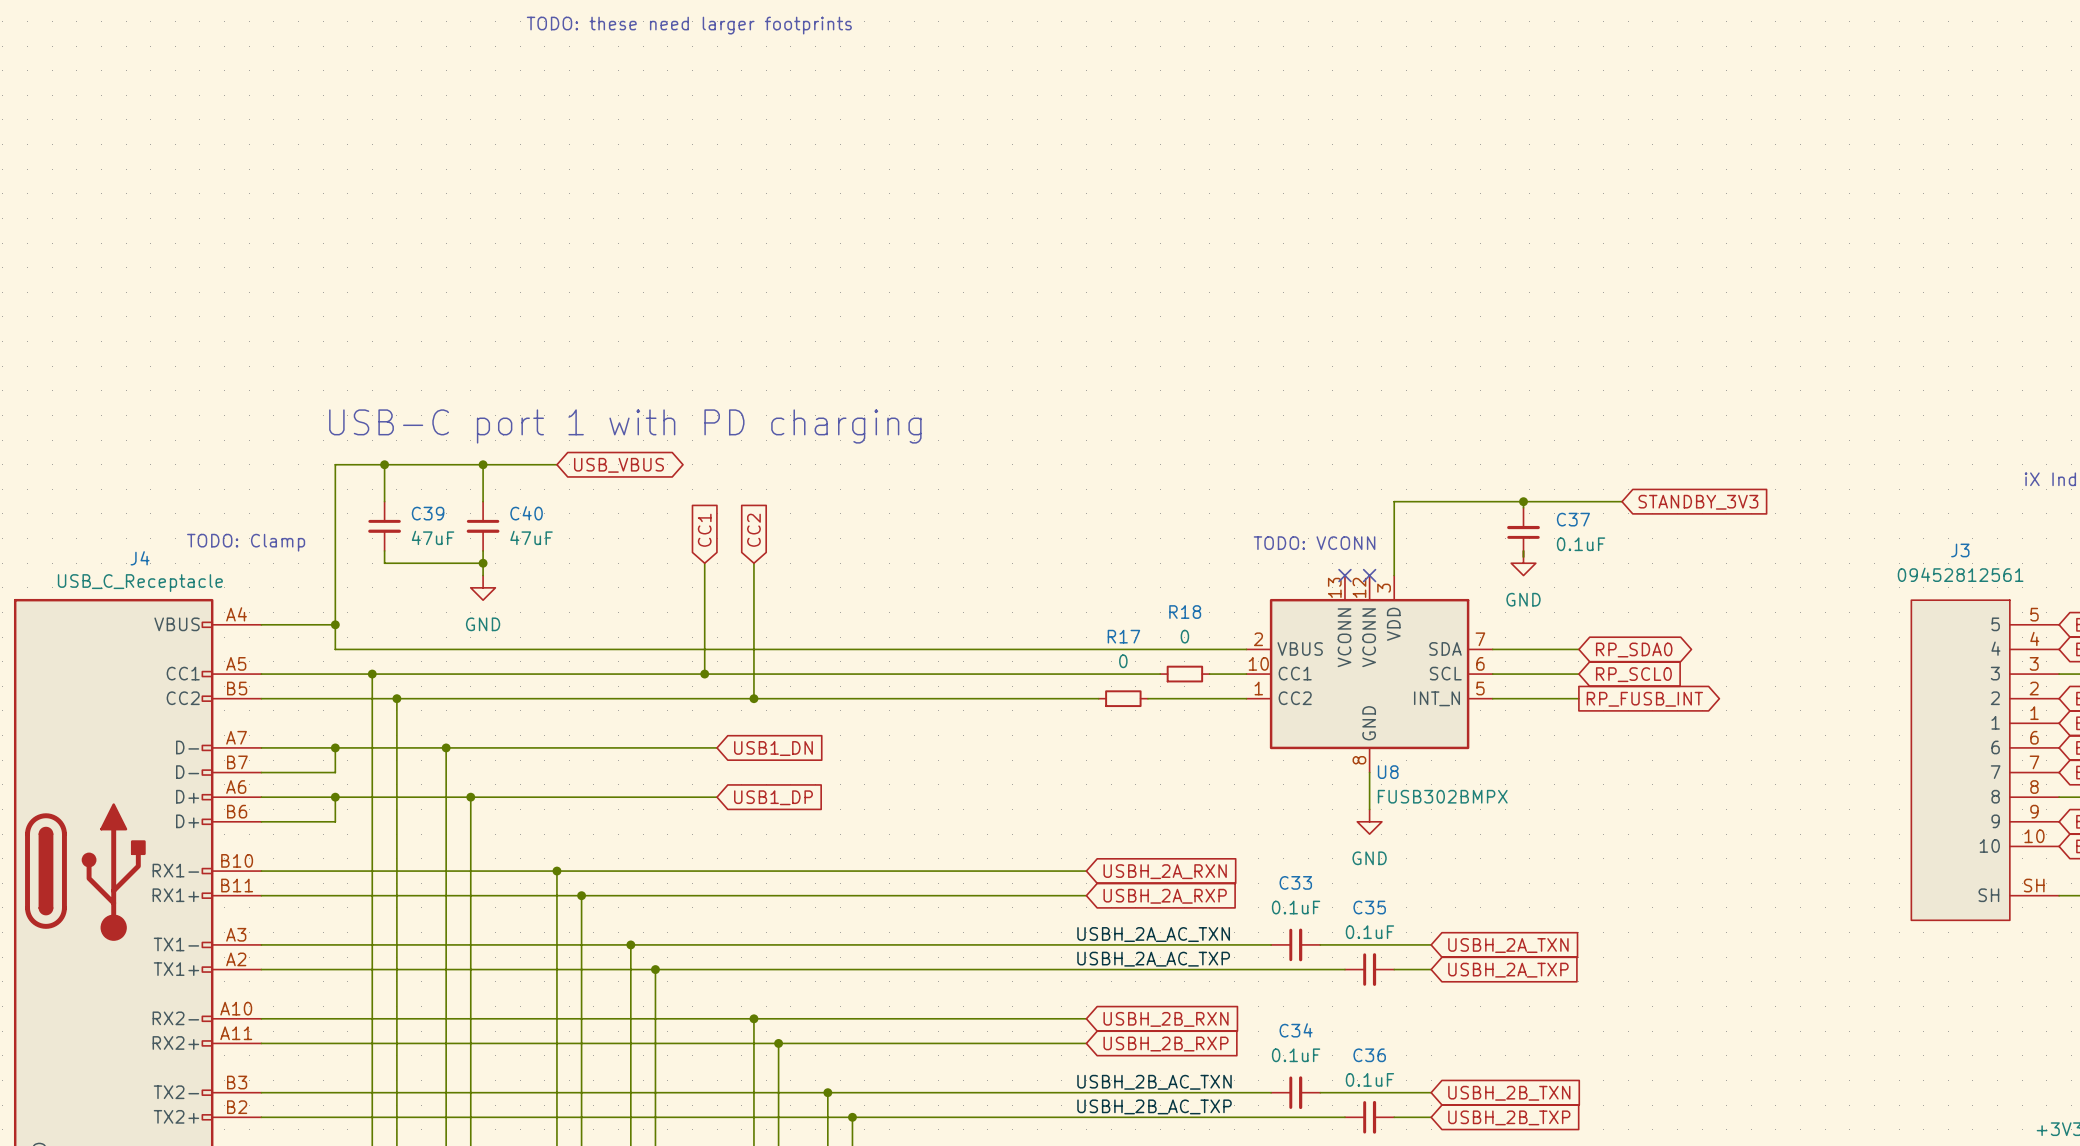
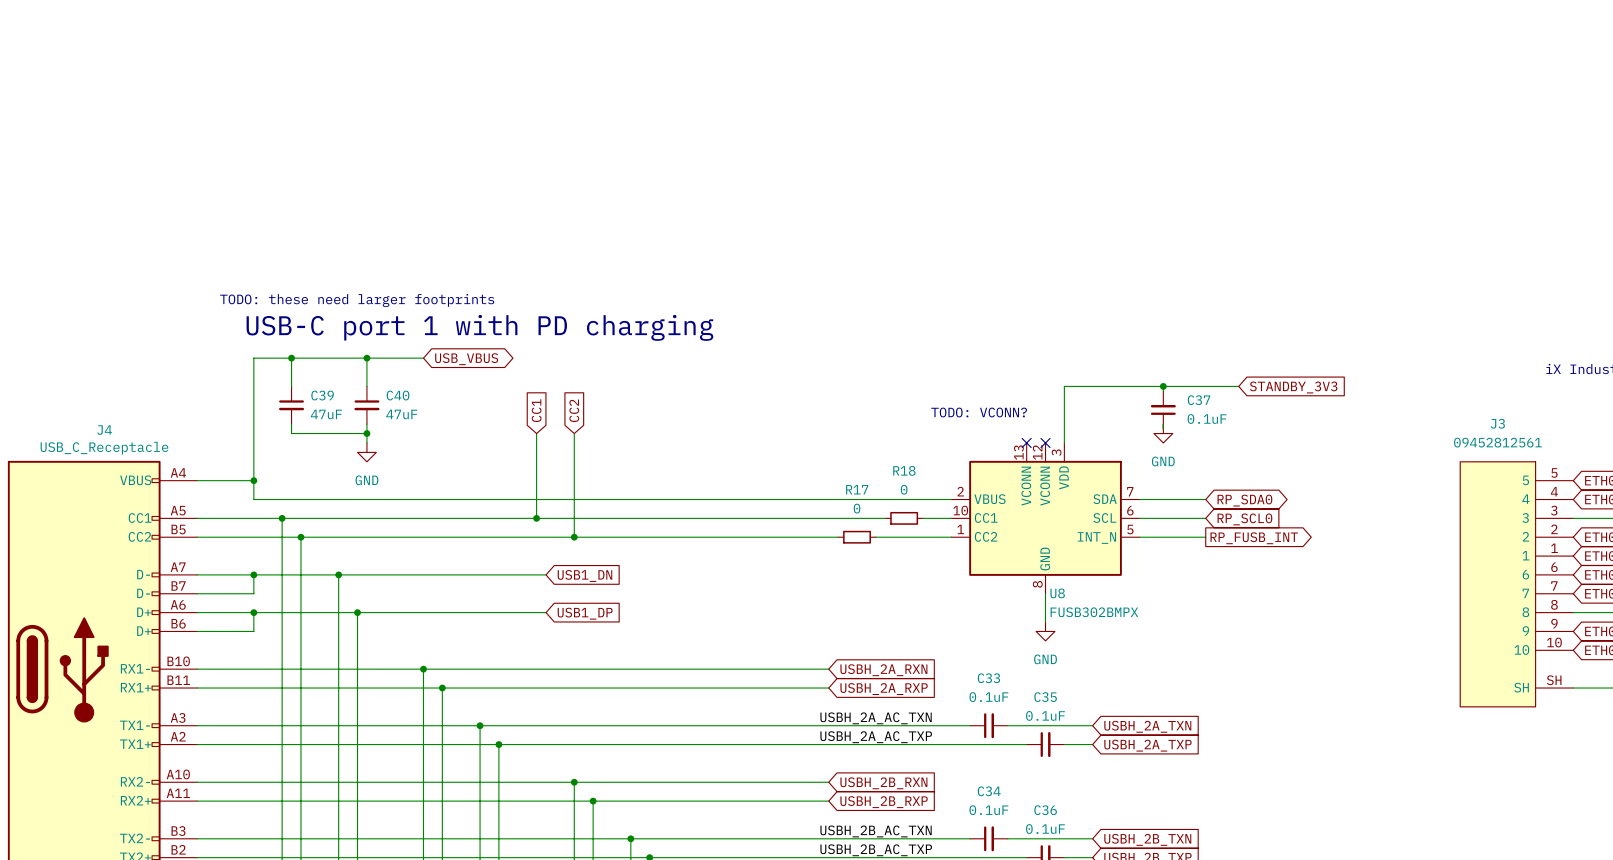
text: TODO: these need larger footprints (689, 25) -> none
text: none -> TODO: these need larger footprints (357, 300)
text: TODO: Clamp (246, 542) -> none
text: TODO: VCONN (1314, 543) -> TODO: VCONN? (979, 412)

